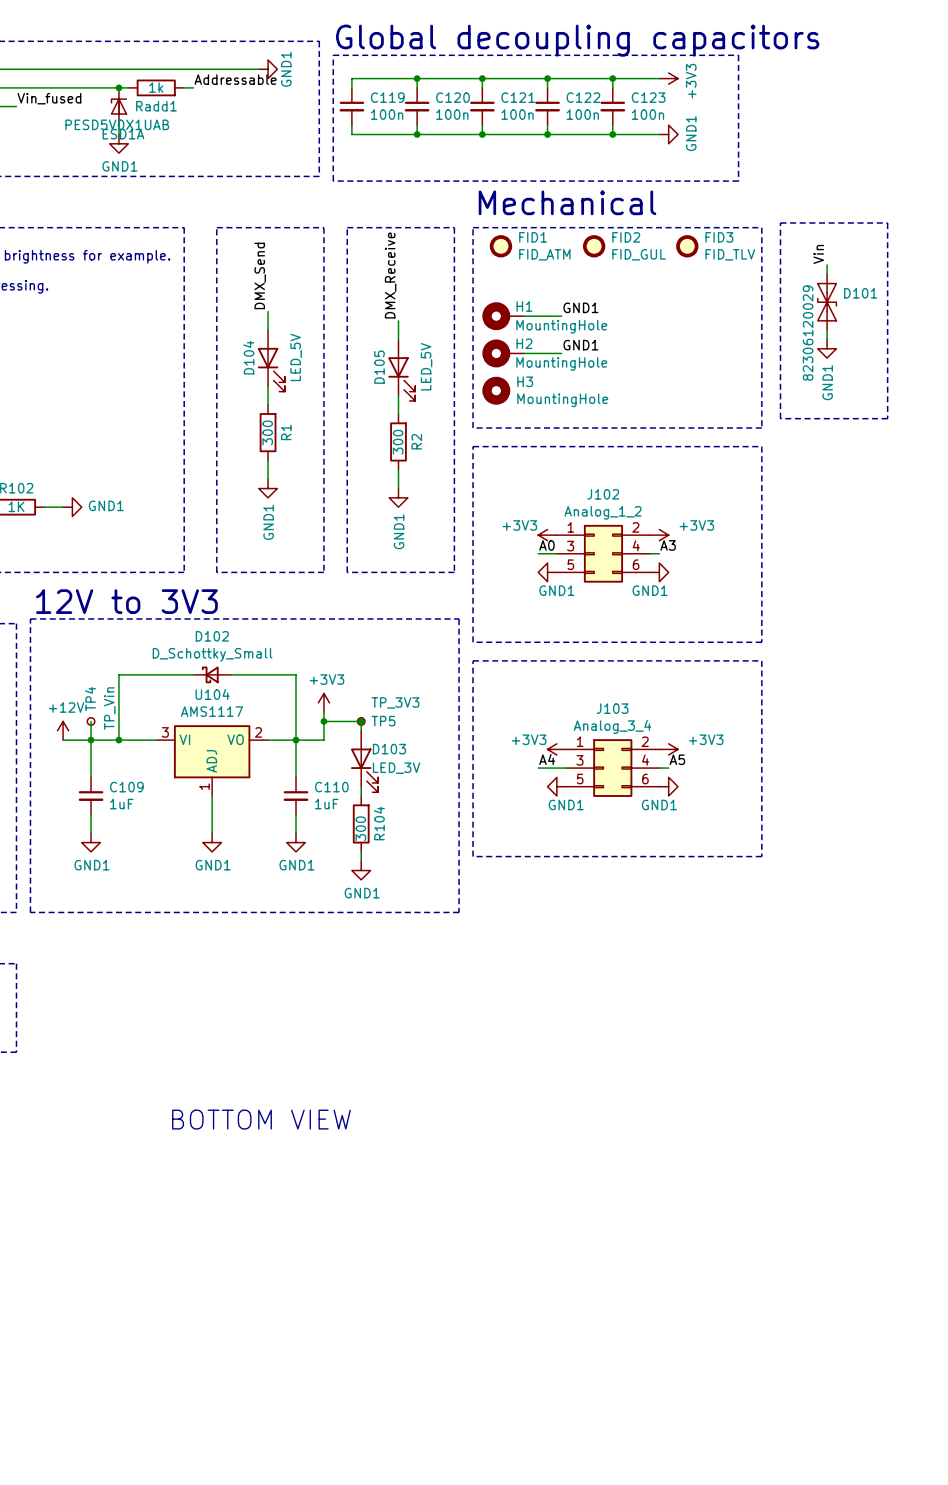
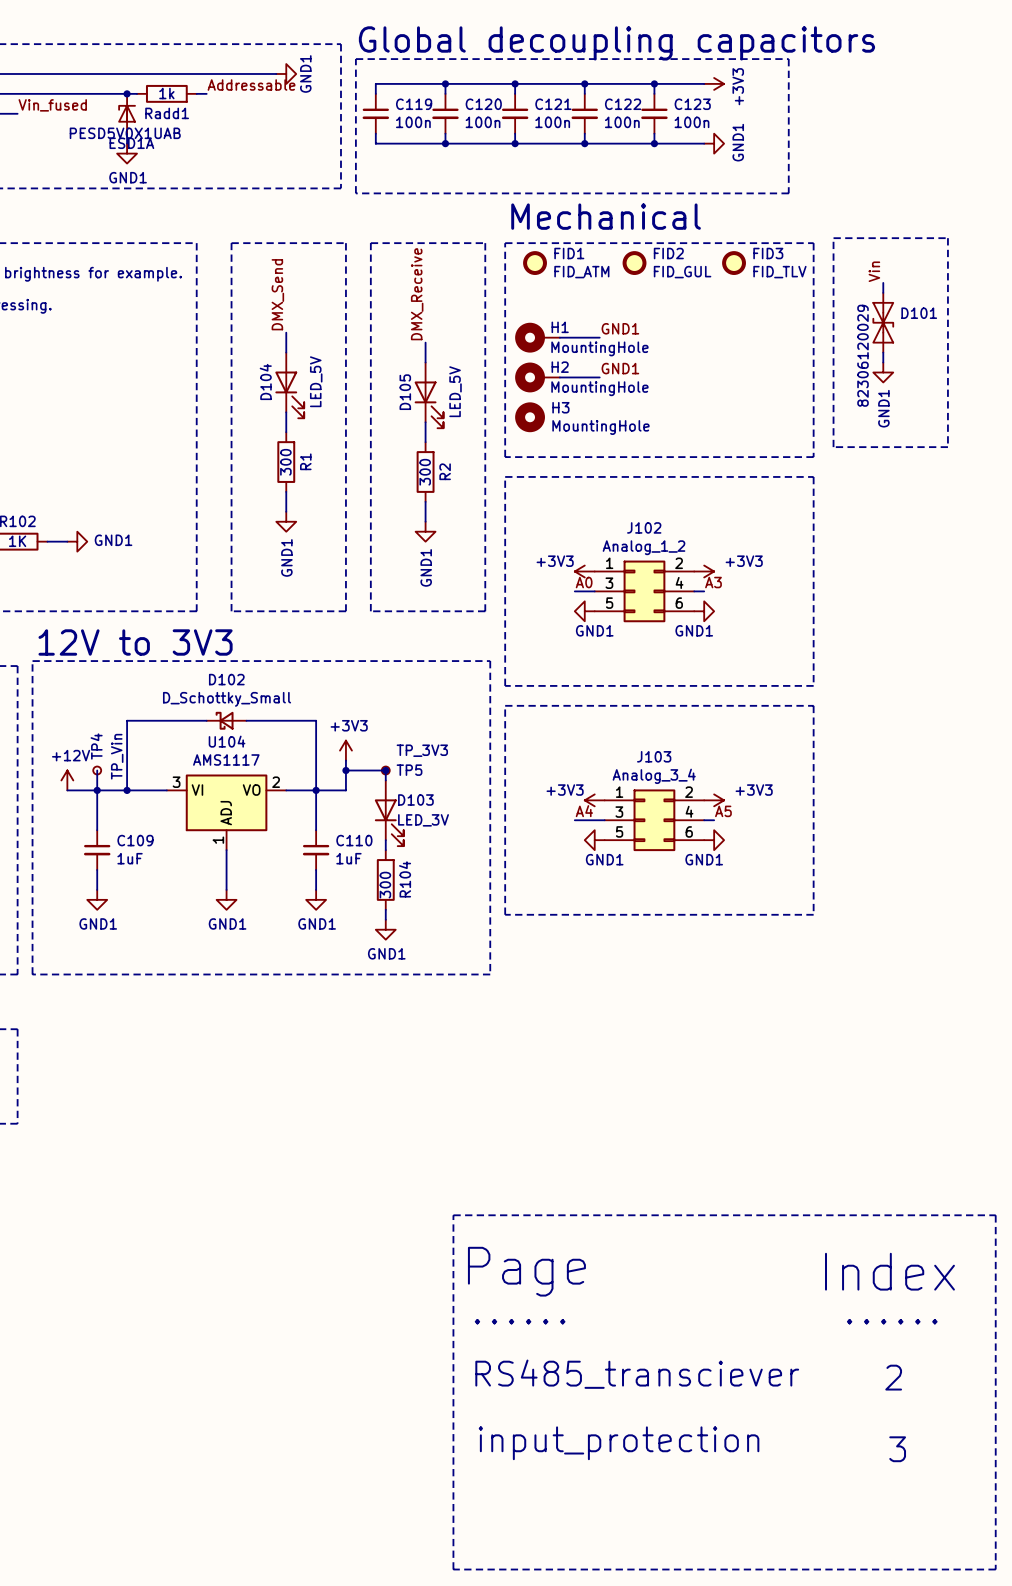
text: BOTTOM VIEW (261, 1119) -> none
line: none -> (453, 1215) (995, 1215) (995, 1569) (453, 1569) (453, 1215)
text: none -> Page (526, 1271)
text: none -> Index (889, 1271)
text: none -> ...... (520, 1321)
text: none -> ...... (892, 1321)
text: none -> RS485_transciever (637, 1374)
text: none -> 2 (893, 1377)
text: none -> input_protection (619, 1443)
text: none -> 3 (897, 1449)

